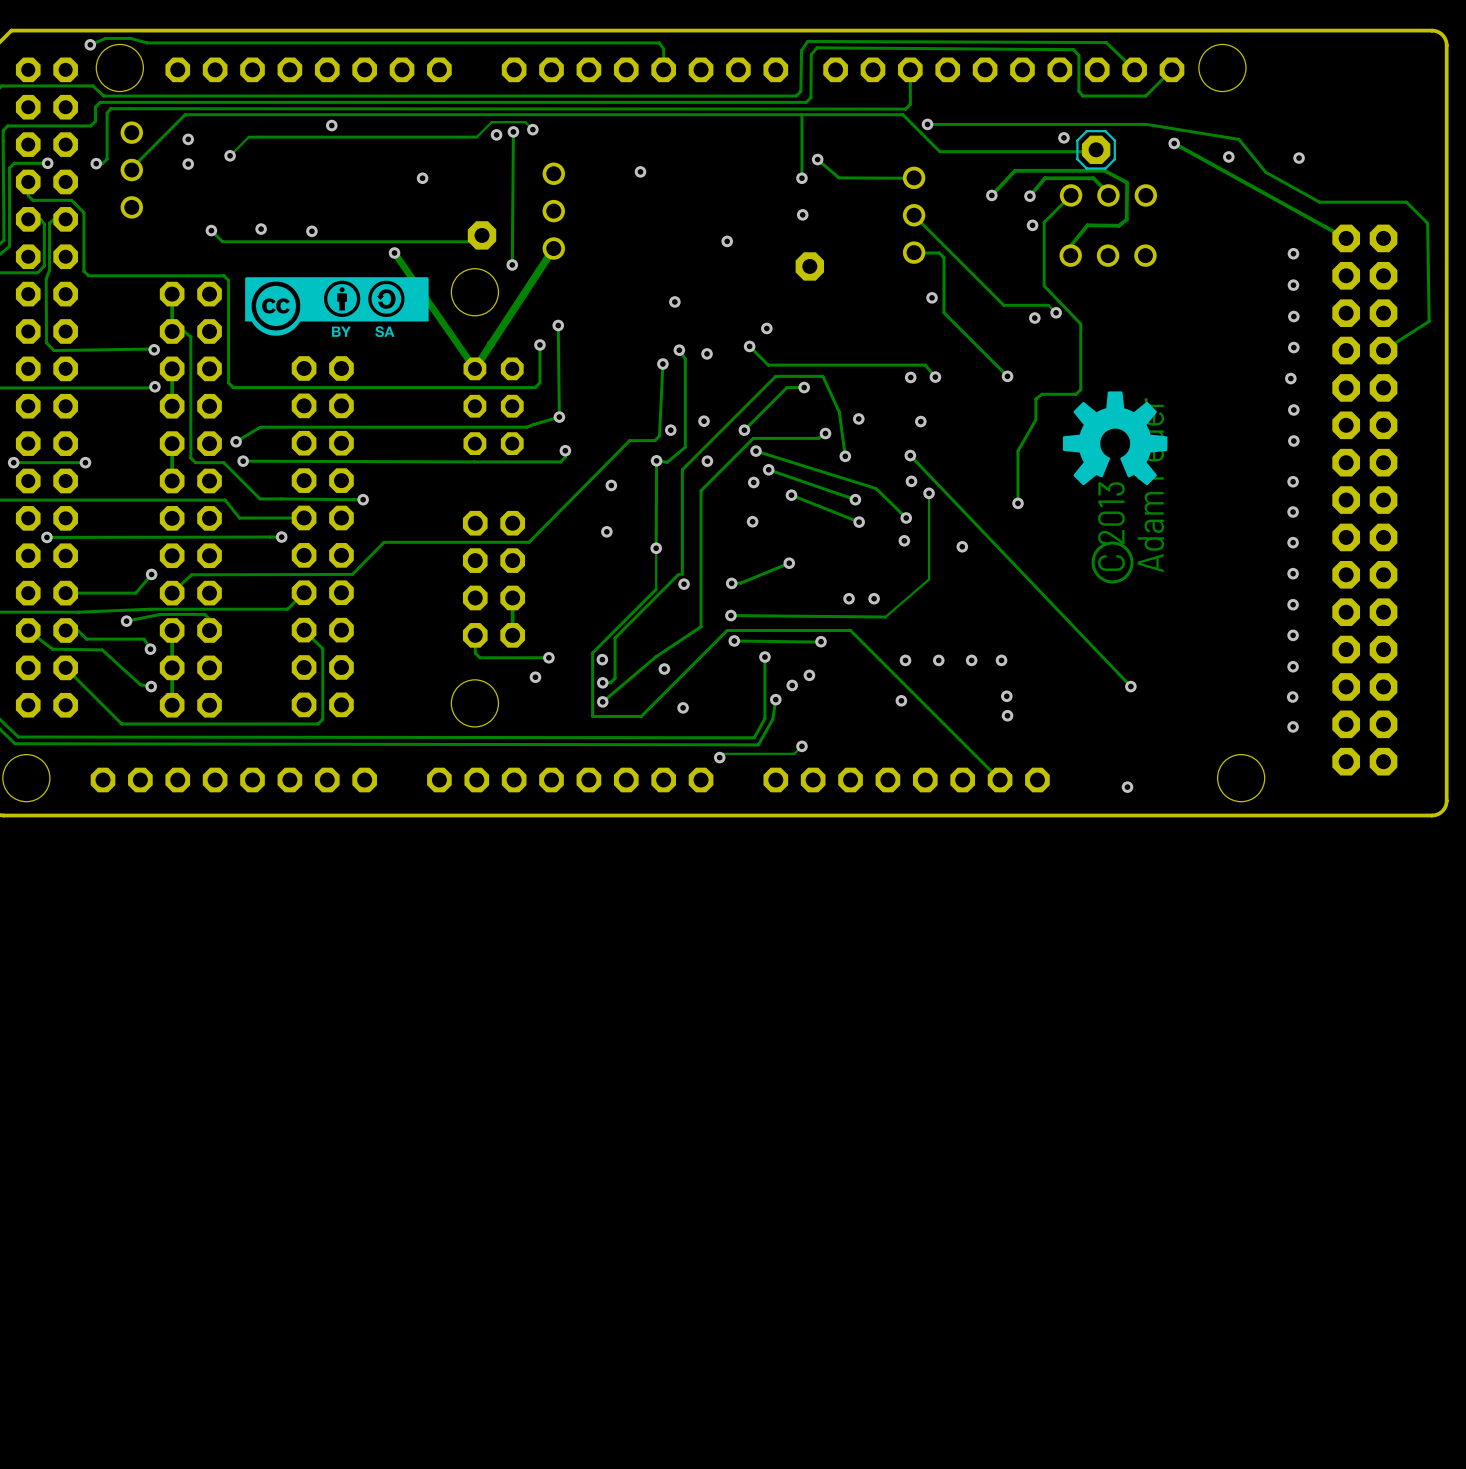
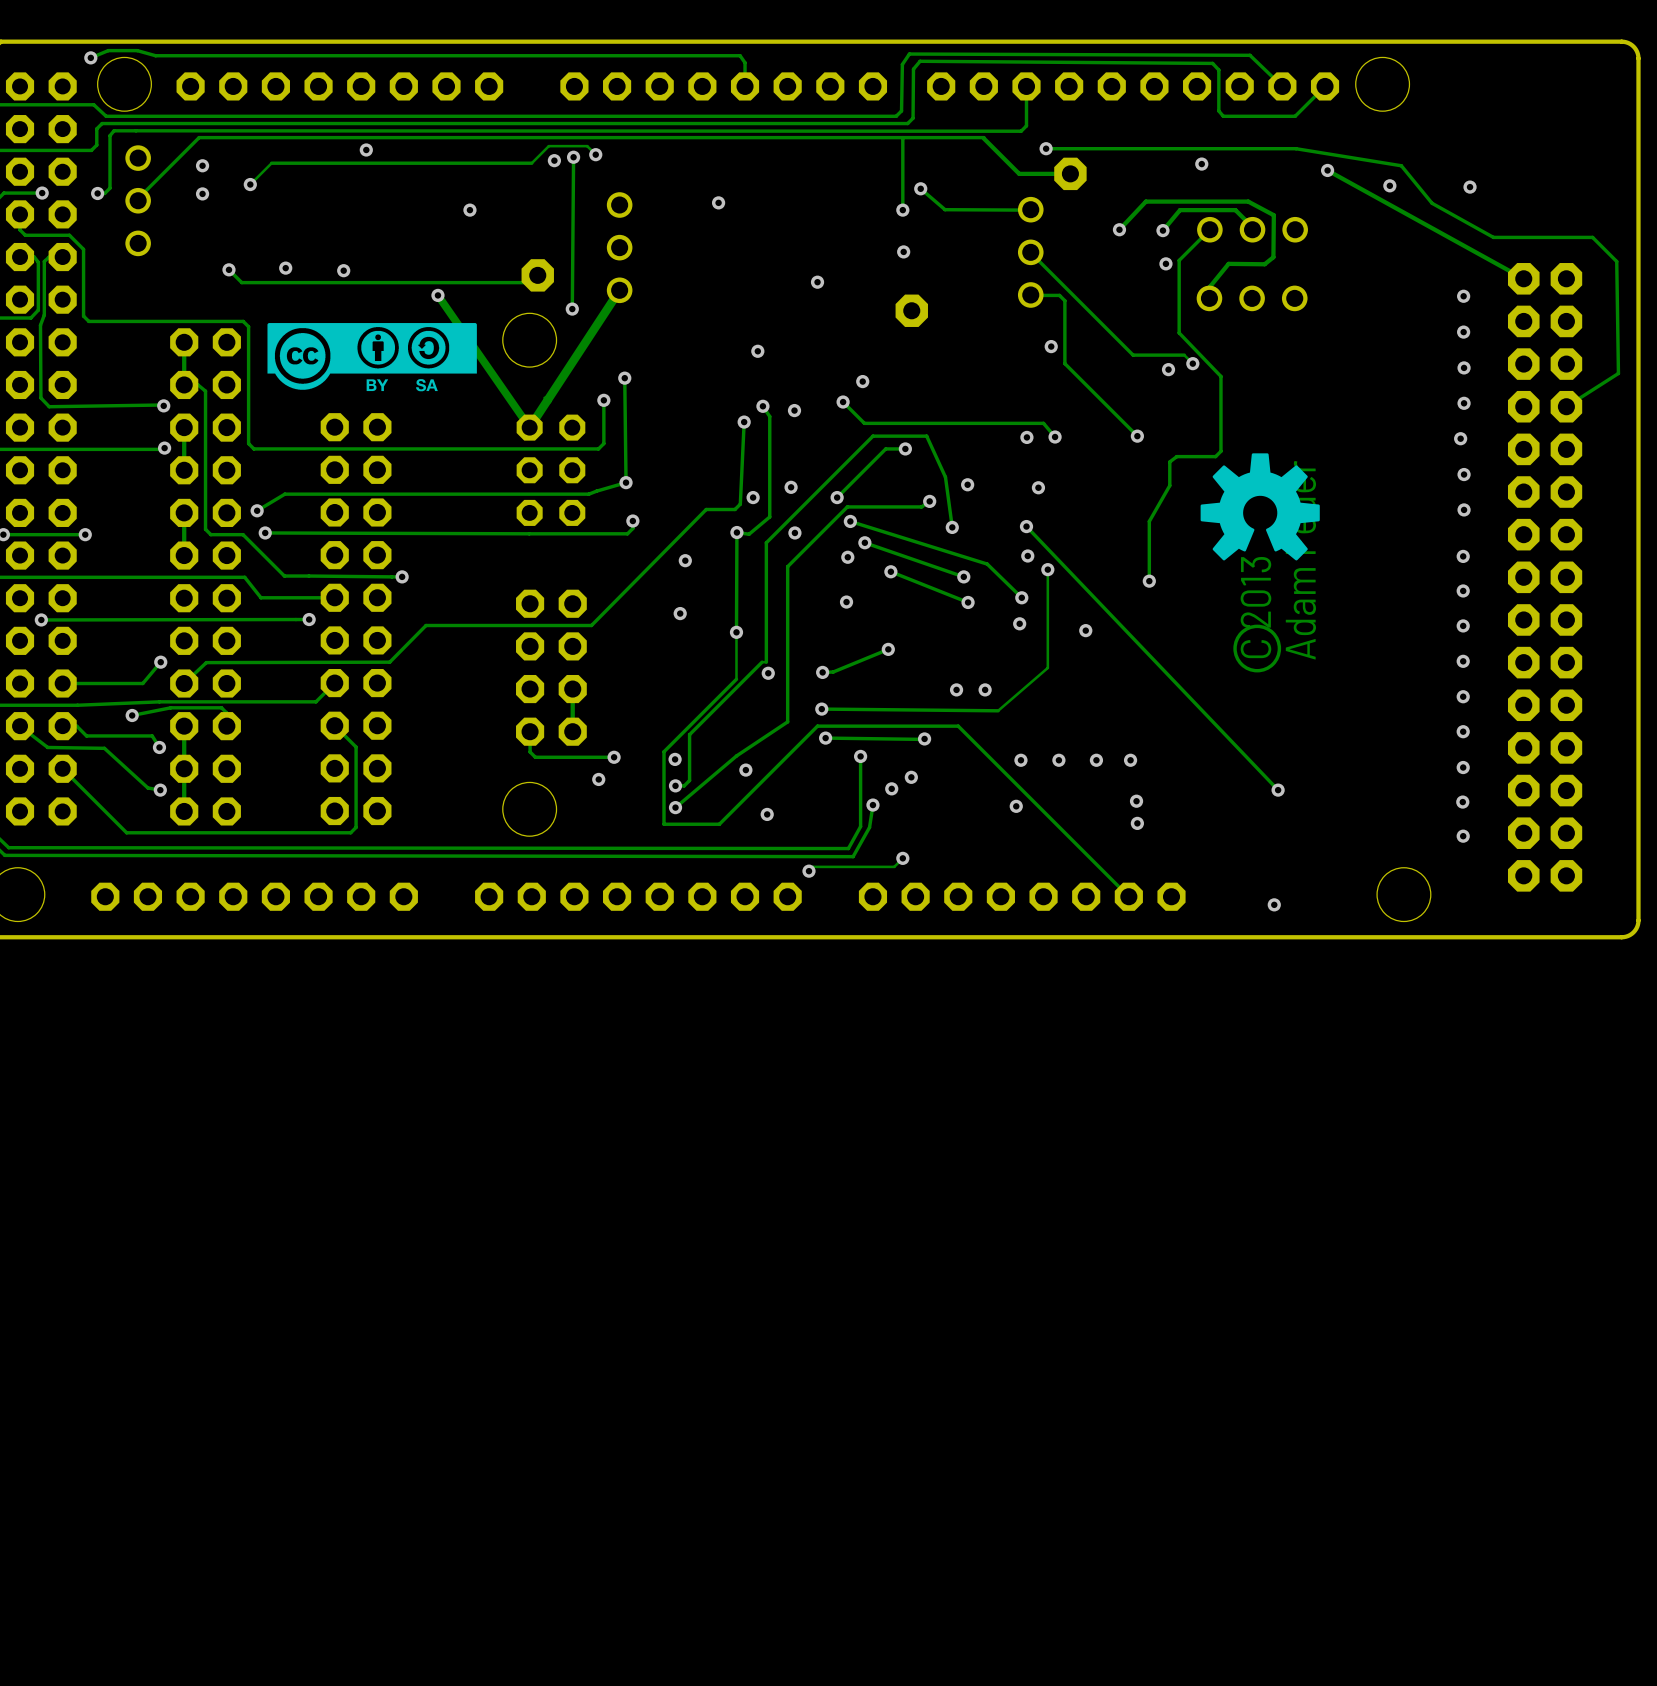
track: (872, 114) (902, 114) (939, 151) (1093, 151) (1096, 149) -> (983, 137) (1019, 173) (1070, 173)
part side: bottom (1096, 149) -> top (1070, 173)

